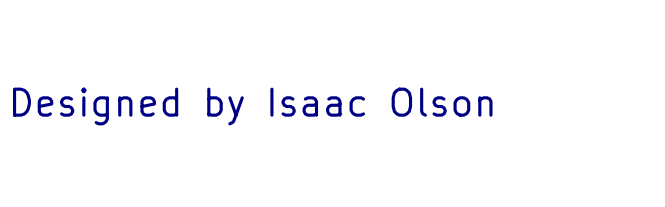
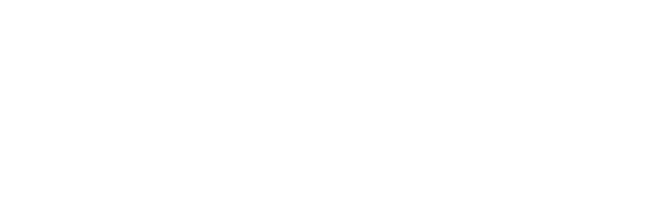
text: Designed by Isaac Olson (252, 106) -> none

